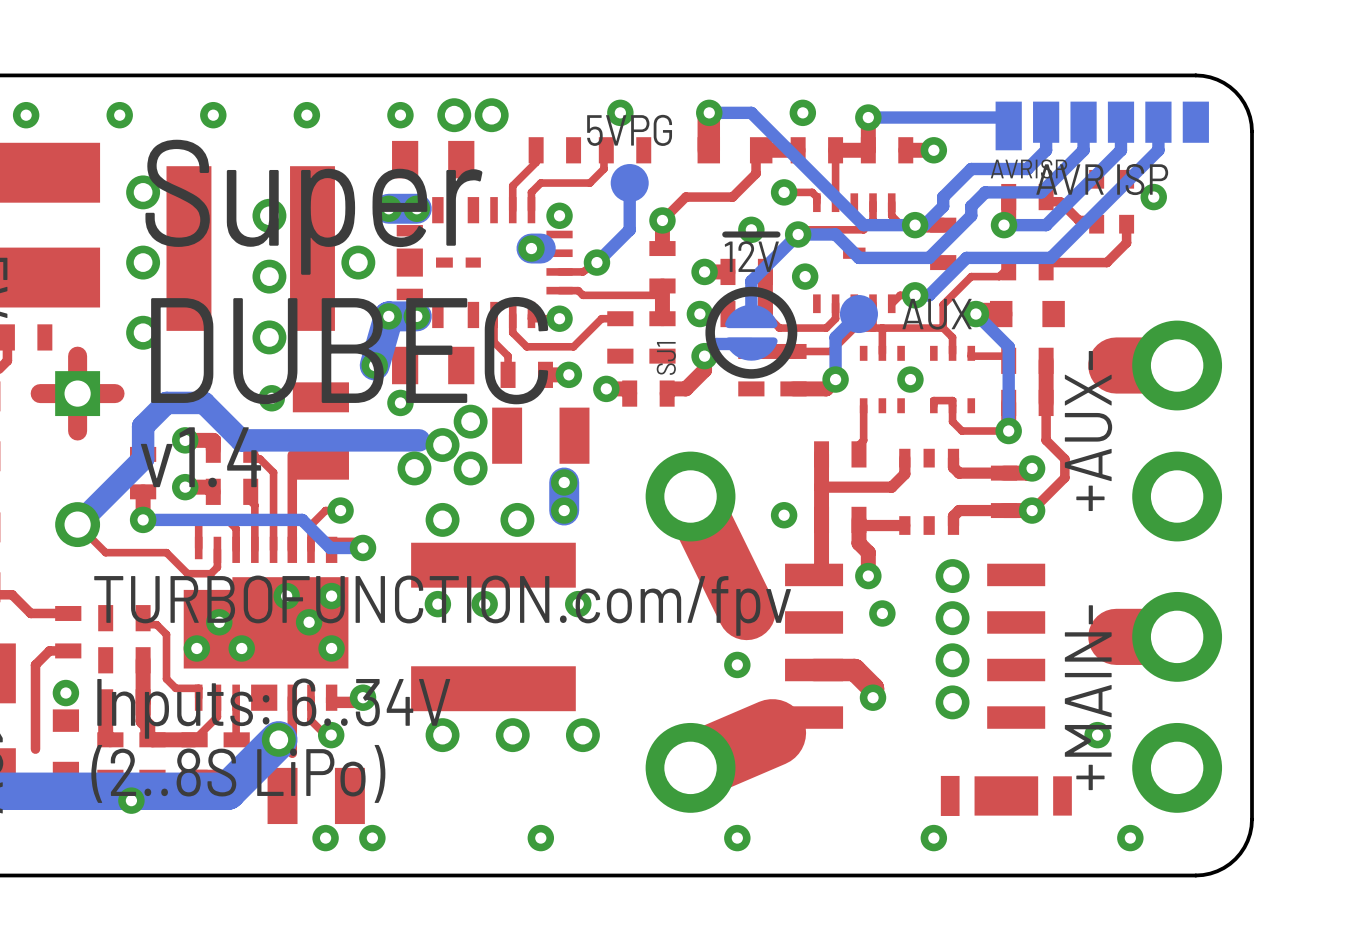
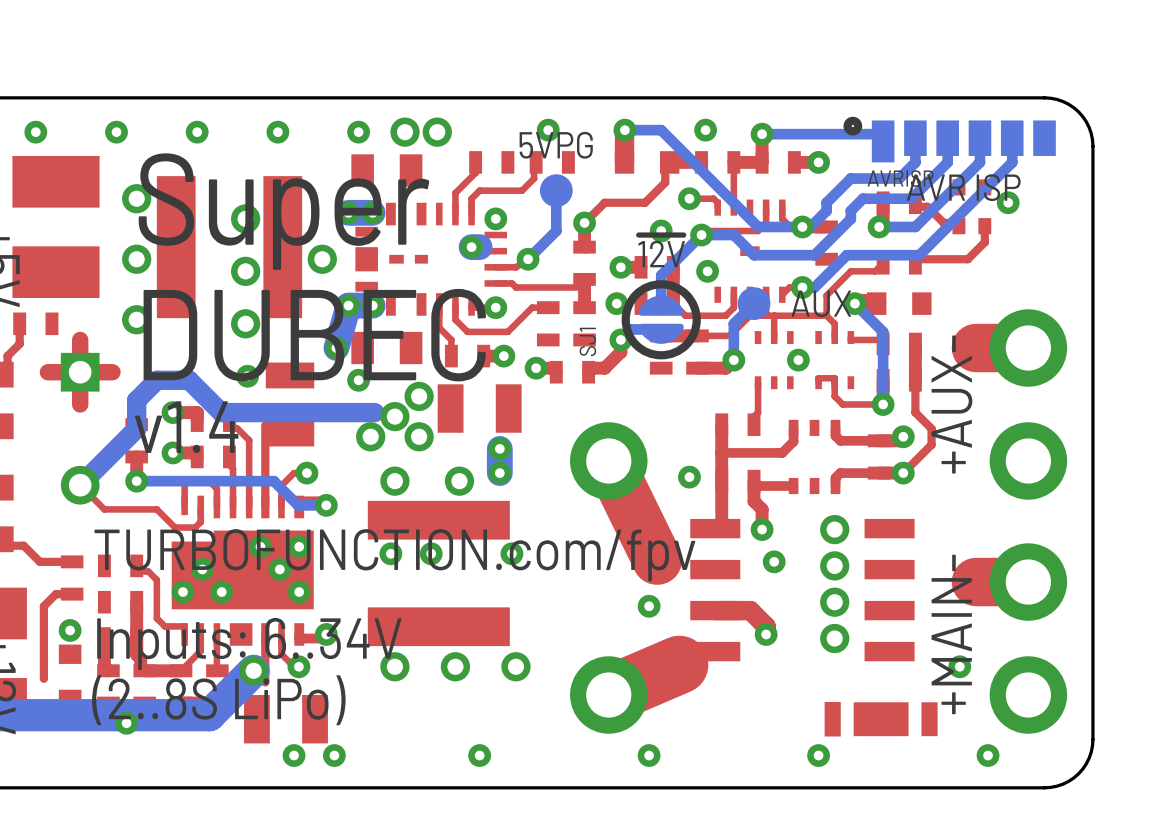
drawing: none -> [843, 116, 863, 136]

